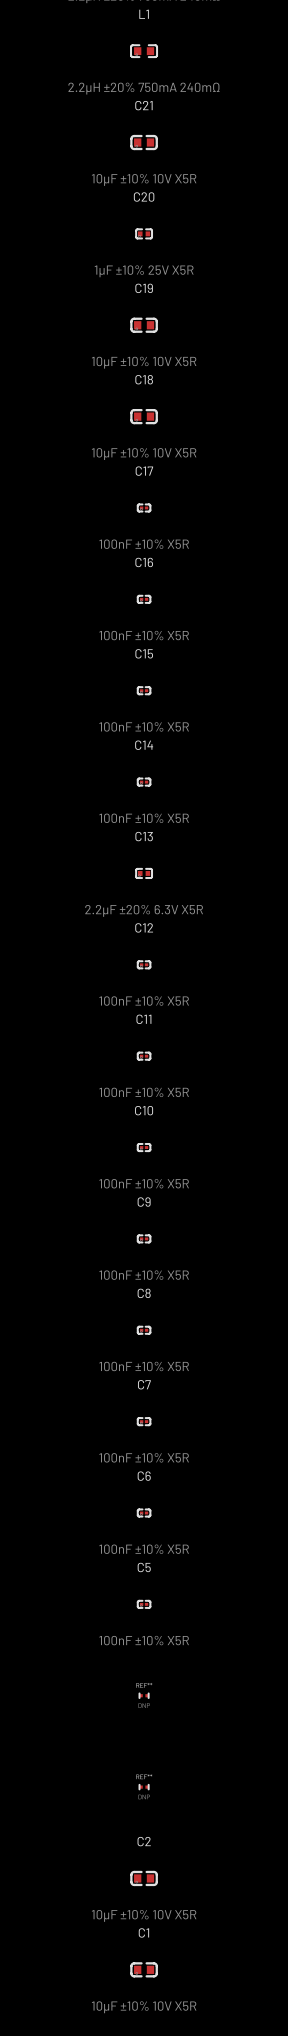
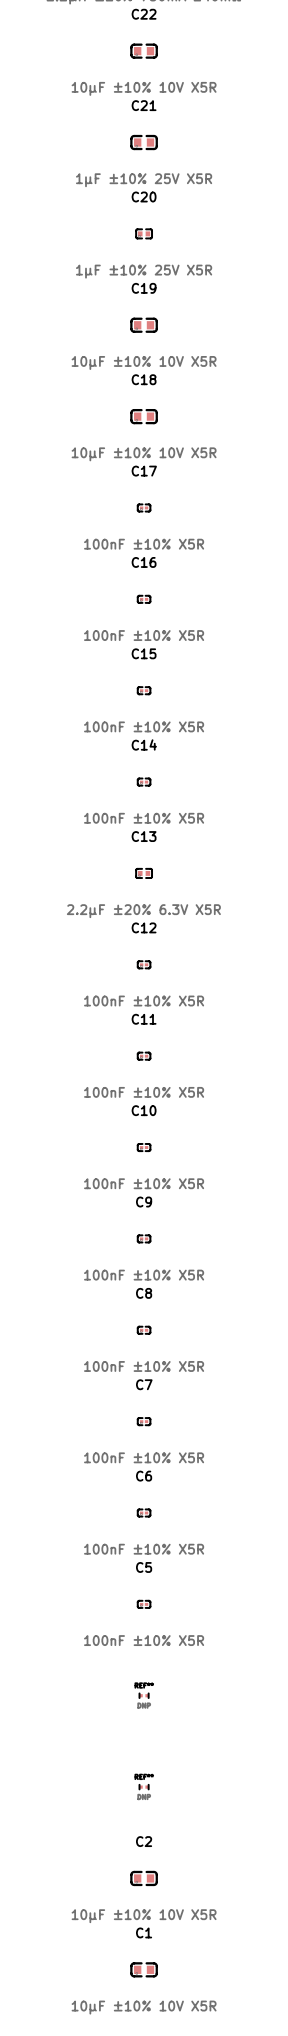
L1: 2.2µH ±20% 750mA 240mΩ (144, 51) -> none
C22: none -> 10µF ±10% 10V X5R (144, 51)
C21 value: 10µF ±10% 10V X5R (144, 179) -> 1µF ±10% 25V X5R (144, 180)

